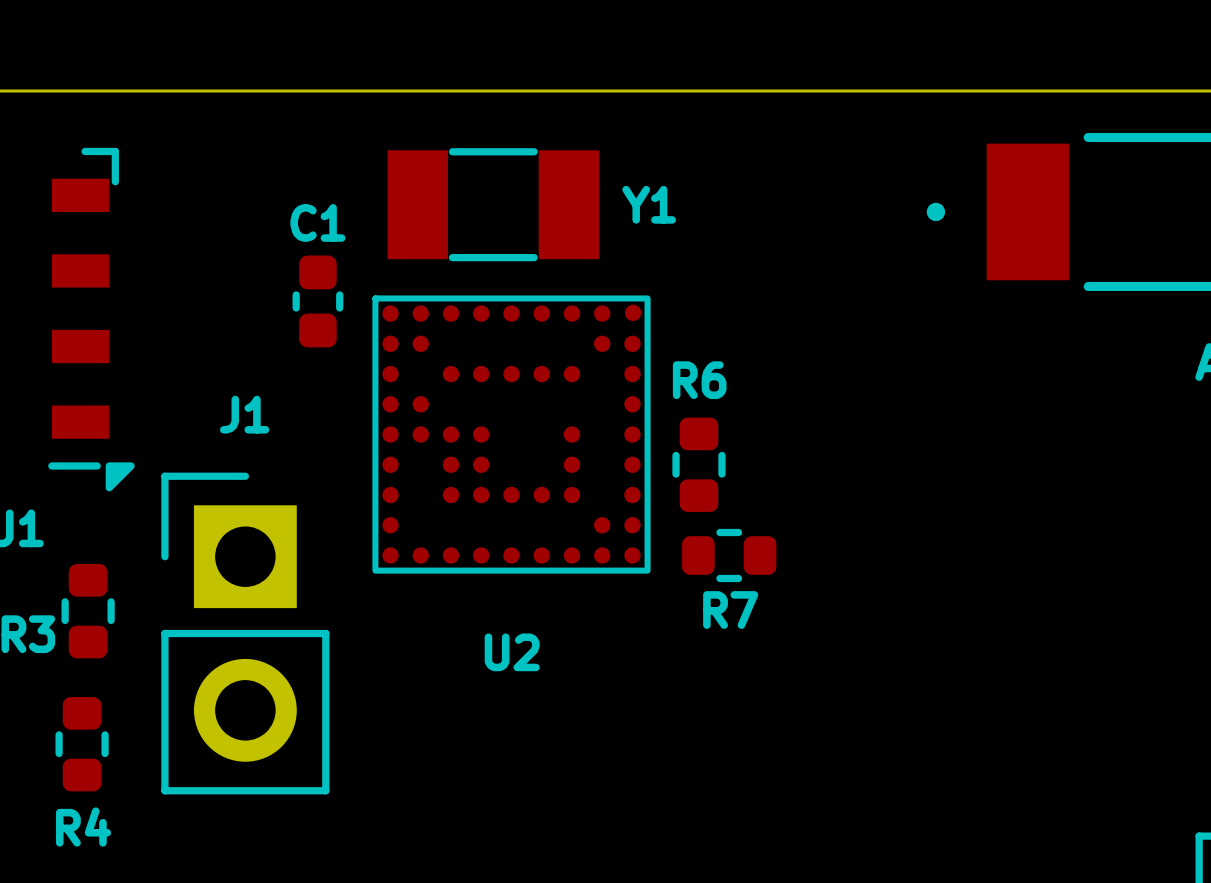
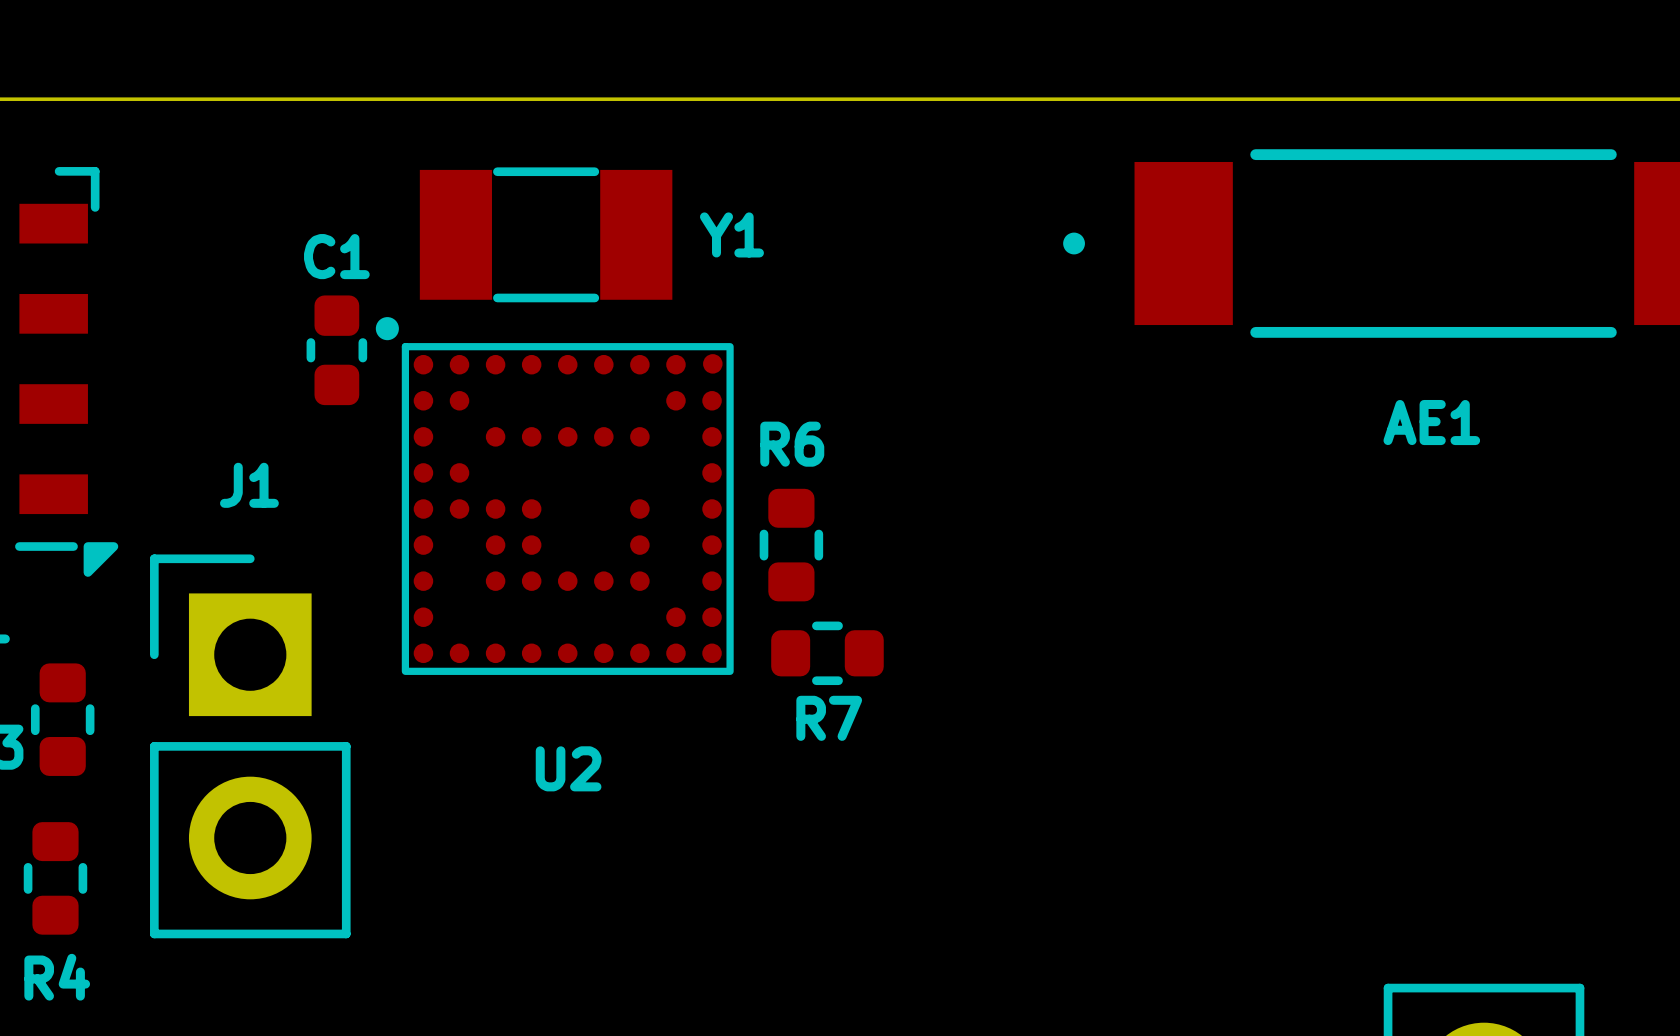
U2 footprint: [372, 295, 651, 574] -> [375, 317, 734, 675]

